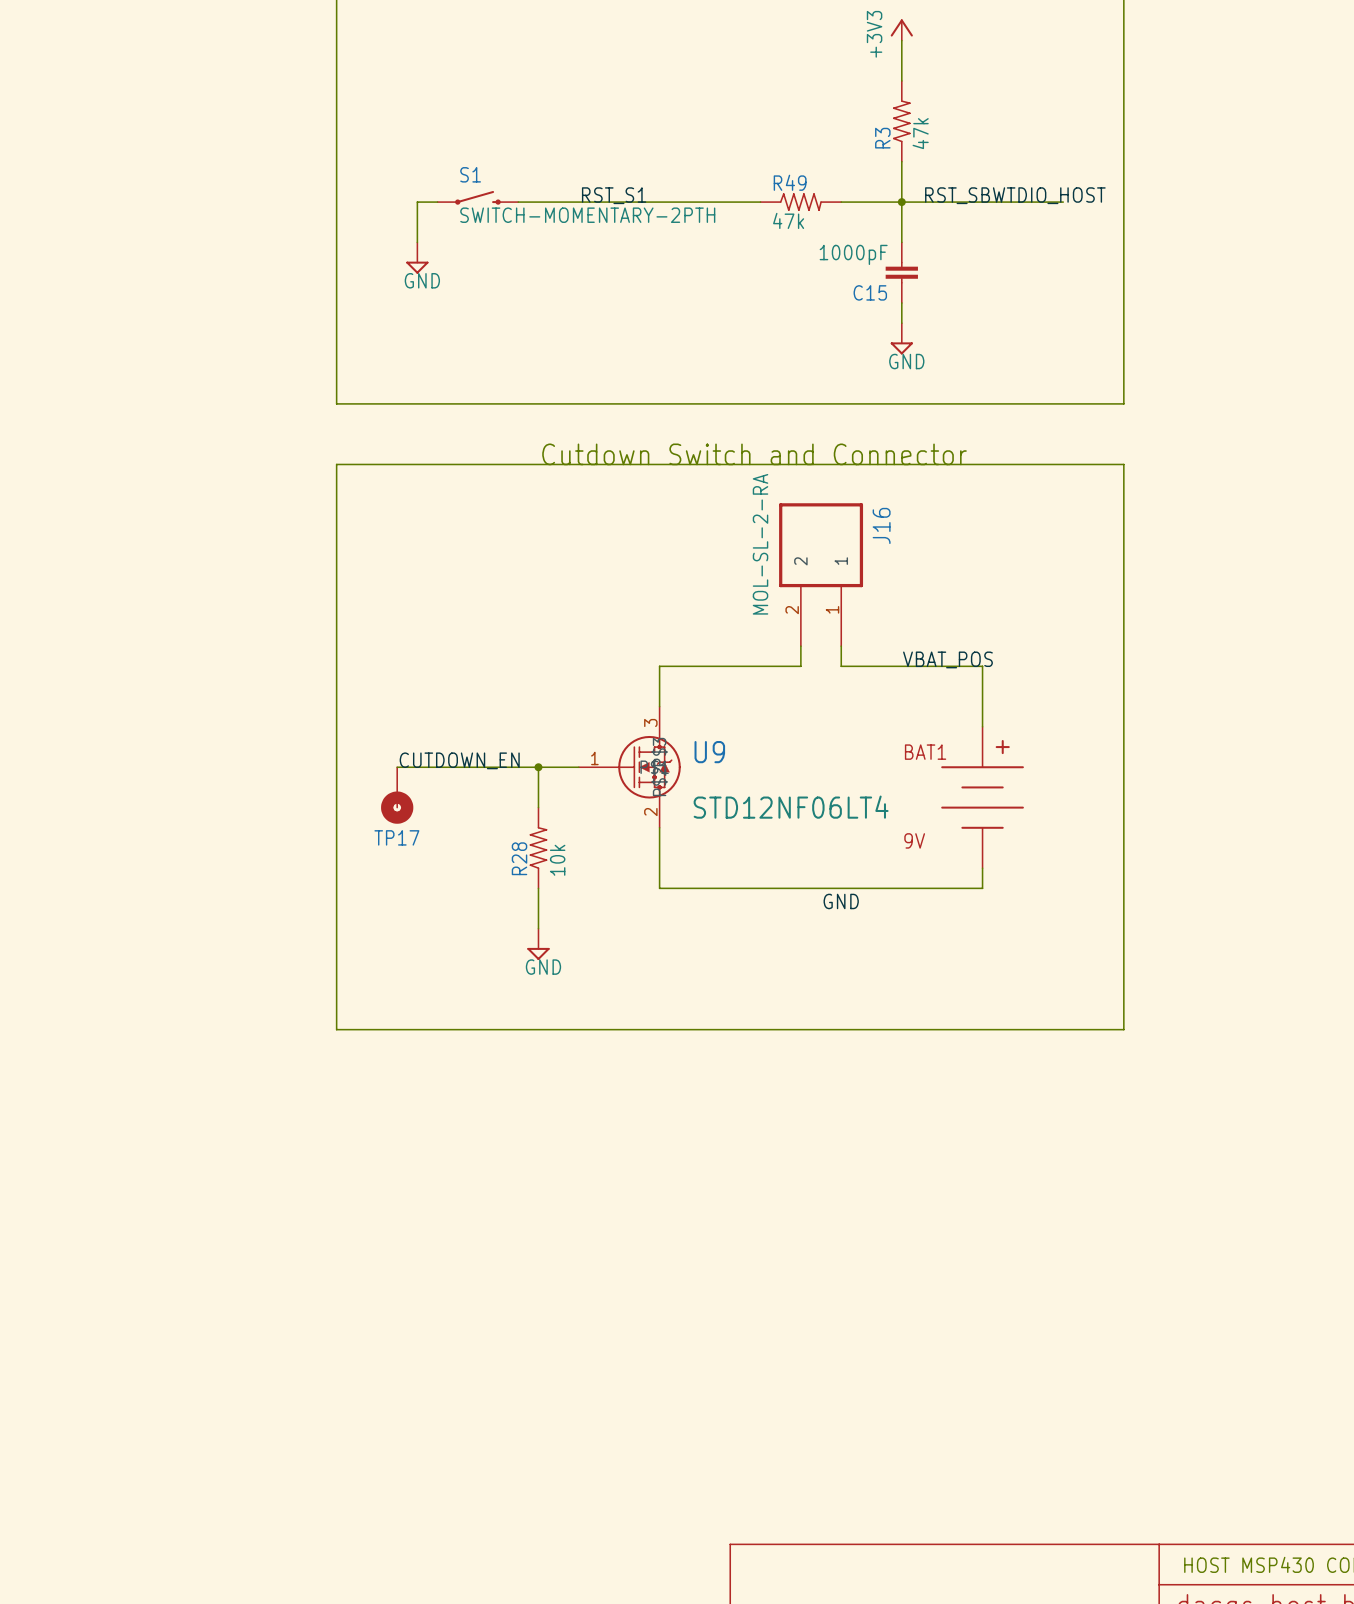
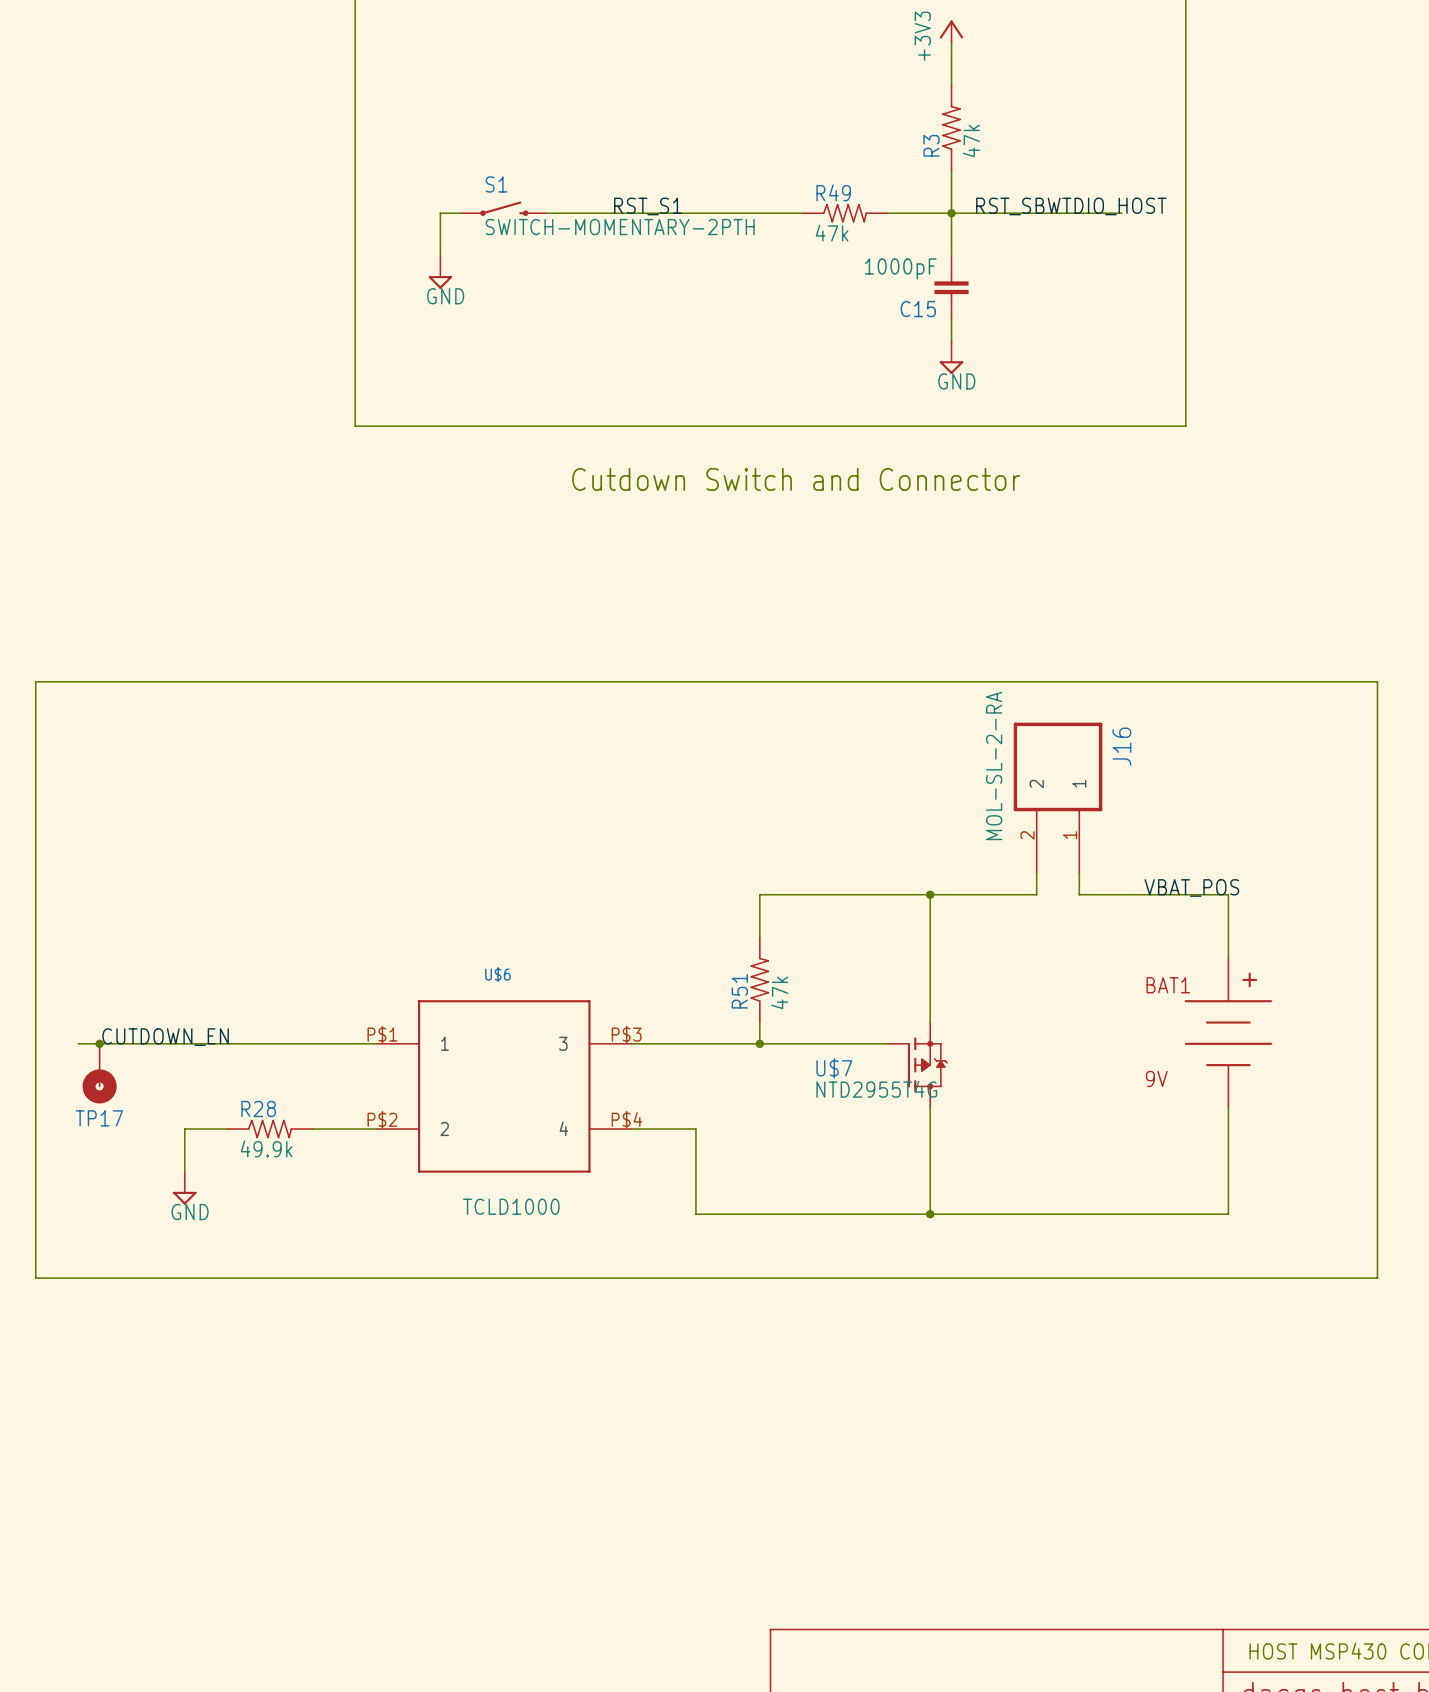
wire: (336, 464) (1123, 464) (1123, 1029) (336, 1029) (336, 464) -> none
J16 position: (821, 574) -> (1058, 798)
wire: none -> (35, 681) (1377, 681) (1377, 1278) (35, 1278) (35, 681)
wire: (800, 646) (800, 666) (659, 666) (659, 706) -> none
wire: (841, 646) (841, 666) (982, 666) (982, 726) -> none
label: VBAT_POS (947, 659) -> none
label: CUTDOWN_EN (459, 760) -> none
wire: (397, 767) (578, 767) -> none
wire: (538, 767) (538, 807) -> none
junction: (538, 767) -> none
U9: STD12NF06LT4 (629, 767) -> none
TP17 position: (397, 795) -> (99, 1073)
BAT1 position: (982, 797) -> (1228, 1033)
wire: (659, 827) (659, 888) (982, 888) (982, 868) -> none
wire: none -> (1036, 873) (1036, 894) (759, 894) (759, 937)
wire: none -> (1079, 873) (1079, 894) (1228, 894) (1228, 958)
label: none -> VBAT_POS (1191, 887)
R28 rotation: 0° (538, 847) -> 90° clockwise (270, 1129)
R28 position: (538, 847) -> (270, 1129)
wire: none -> (930, 894) (930, 1022)
junction: none -> (930, 894)
R28 value: 10k (557, 860) -> 49.9k (266, 1148)
wire: (538, 888) (538, 928) -> none
label: GND (841, 901) -> none
R51: none -> 47k (759, 979)
power symbol: GND (538, 944) -> none
wire: none -> (759, 1022) (759, 1043)
label: none -> CUTDOWN_EN (165, 1037)
wire: none -> (78, 1043) (376, 1043)
junction: none -> (99, 1043)
wire: none -> (632, 1043) (887, 1043)
junction: none -> (759, 1043)
U$7: none -> NTD2955T4G (917, 1065)
U$6: none -> TCLD1000 (504, 1086)
wire: none -> (930, 1107) (930, 1214)
wire: none -> (1228, 1107) (1228, 1214) (695, 1214) (695, 1129) (632, 1129)
wire: none -> (227, 1129) (184, 1129) (184, 1171)
wire: none -> (312, 1129) (376, 1129)
power symbol: none -> GND (184, 1188)
junction: none -> (930, 1214)

